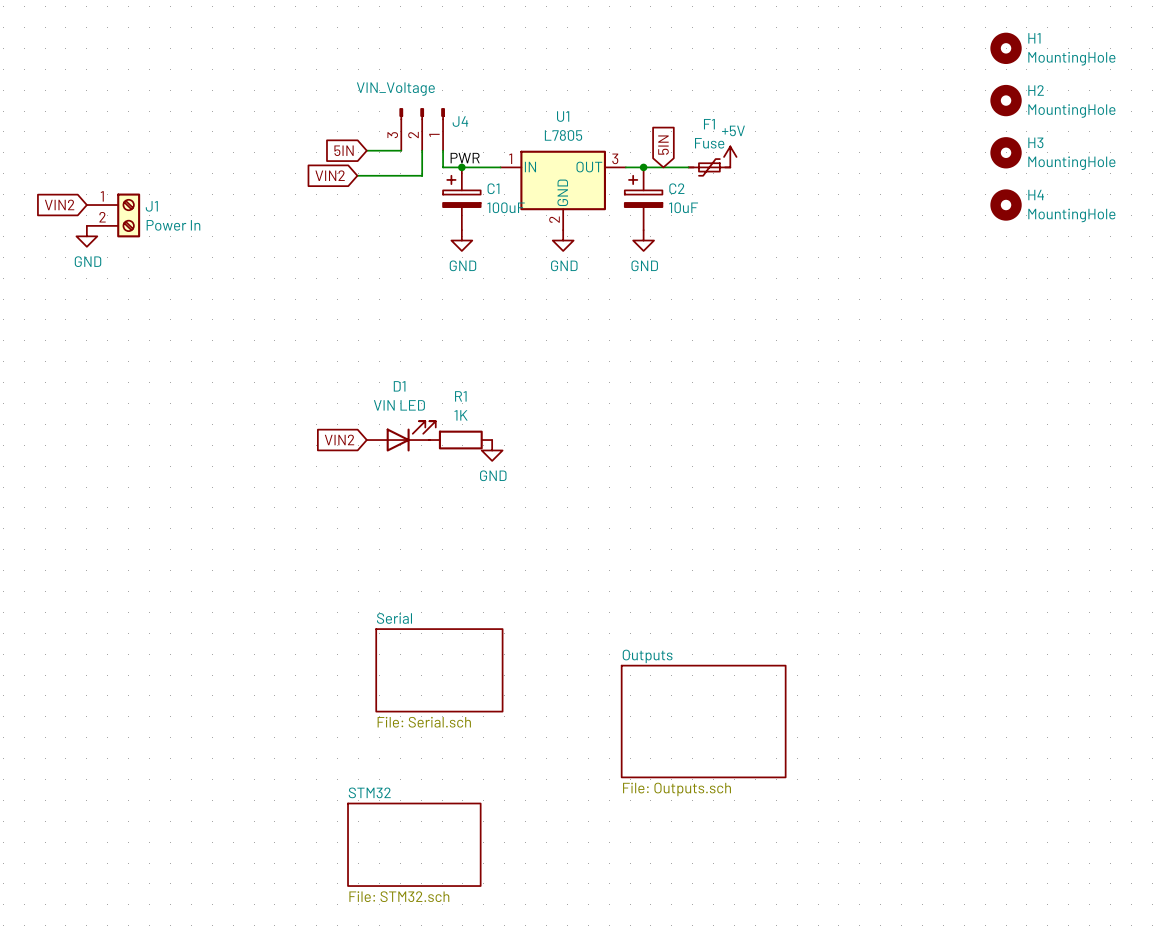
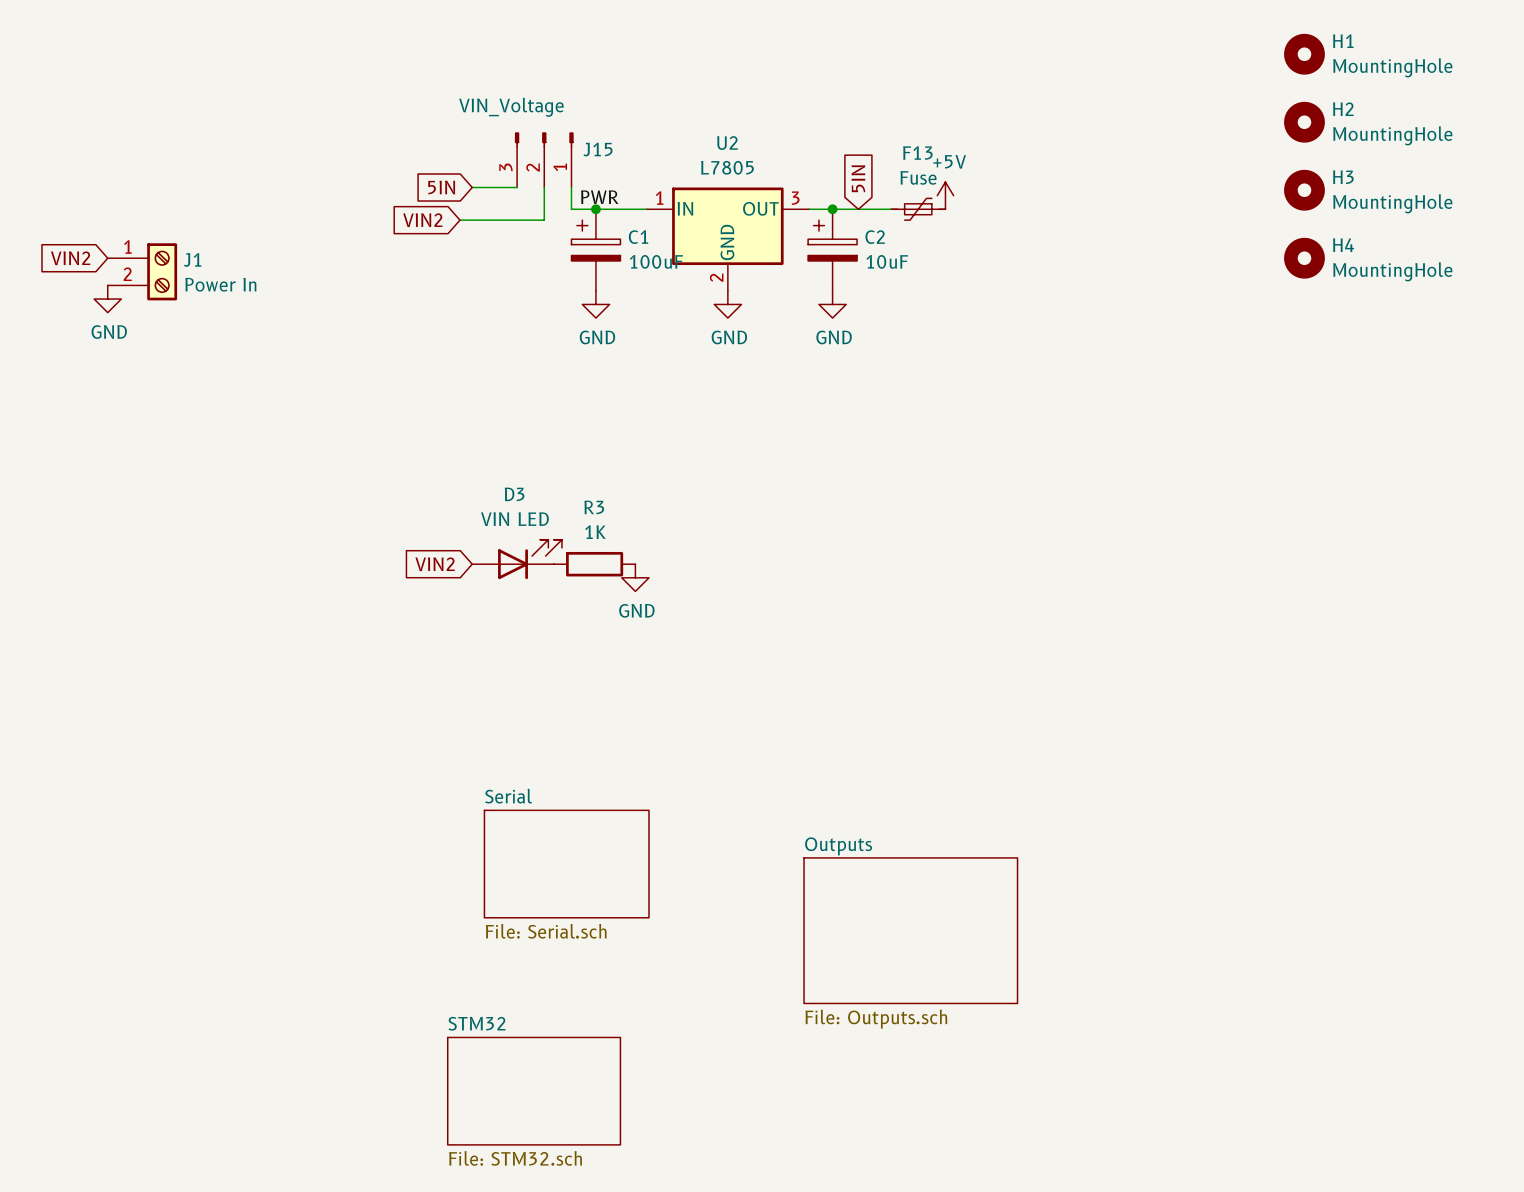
U1 name: U1 (563, 116) -> U2 (727, 143)
J4 name: J4 (460, 121) -> J15 (597, 149)
F1 name: F1 (709, 124) -> F13 (917, 153)
D1 name: D1 (399, 386) -> D3 (514, 494)
R1 name: R1 (460, 396) -> R3 (594, 507)

